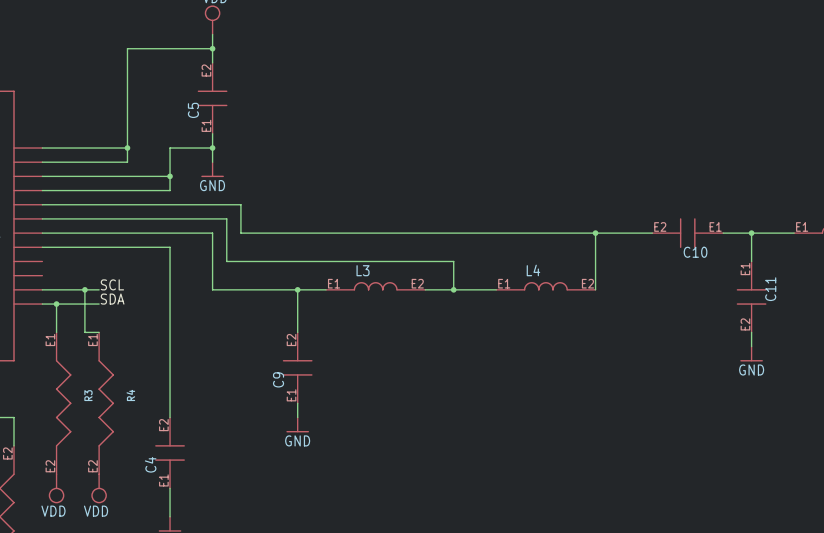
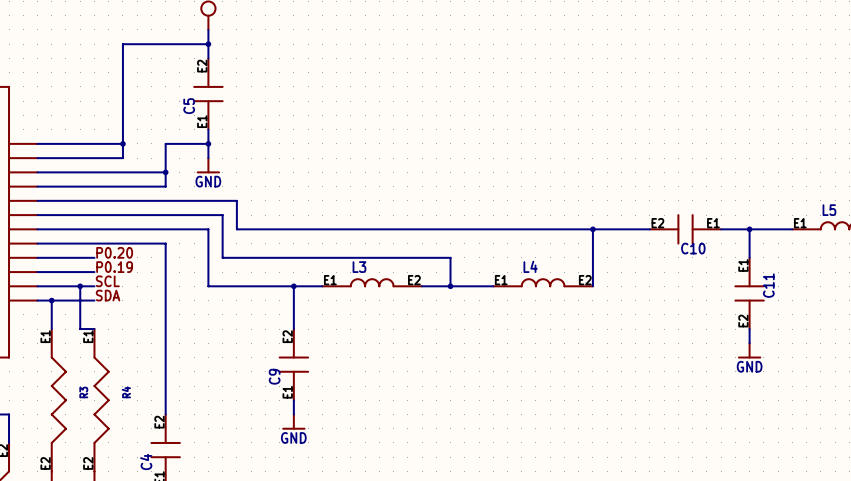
label: none -> P0.20 (114, 252)
wire: none -> (37, 257) (94, 257)
label: none -> P0.19 (114, 267)
wire: none -> (37, 272) (94, 272)

